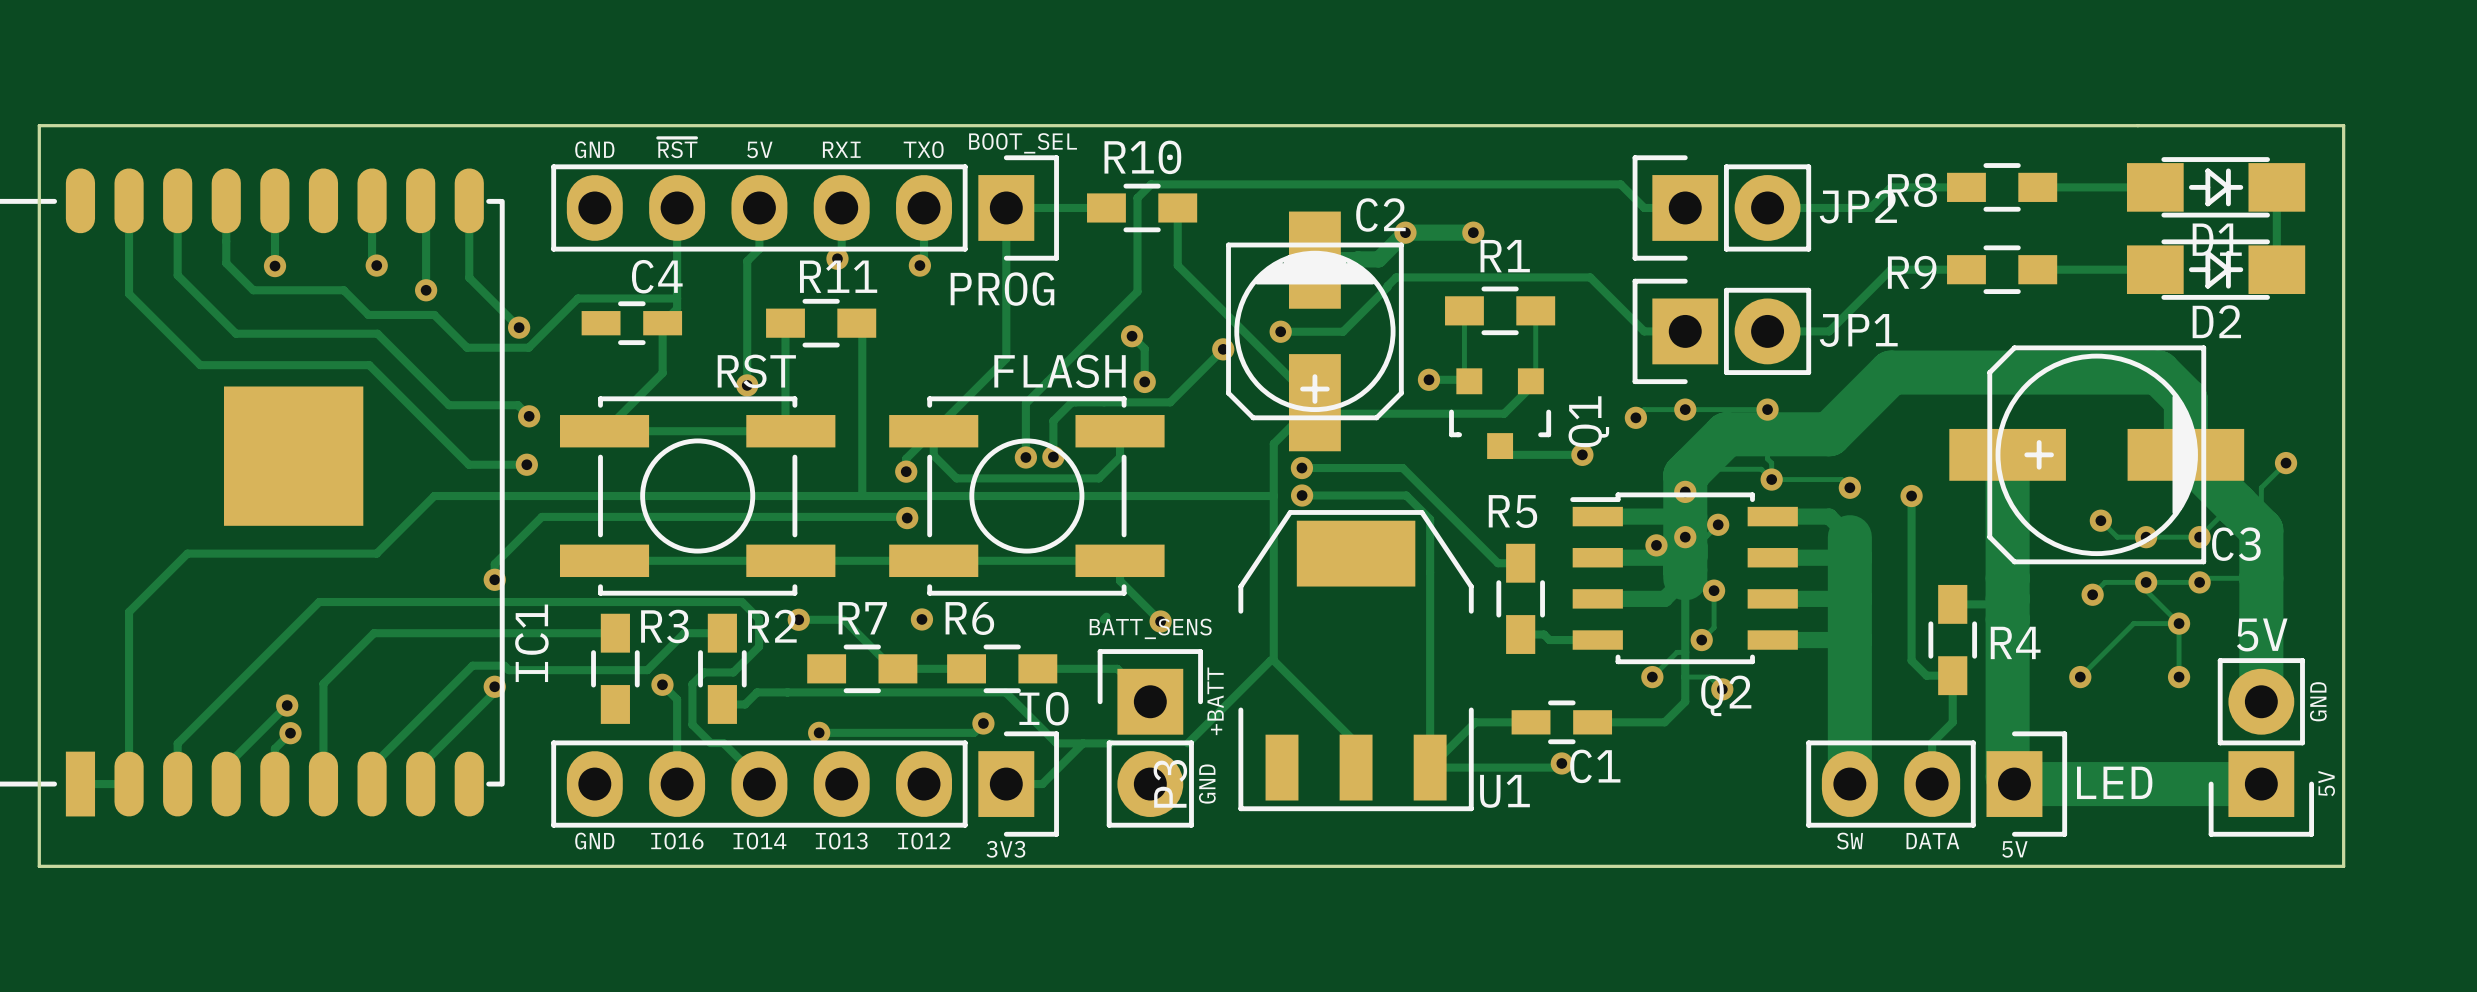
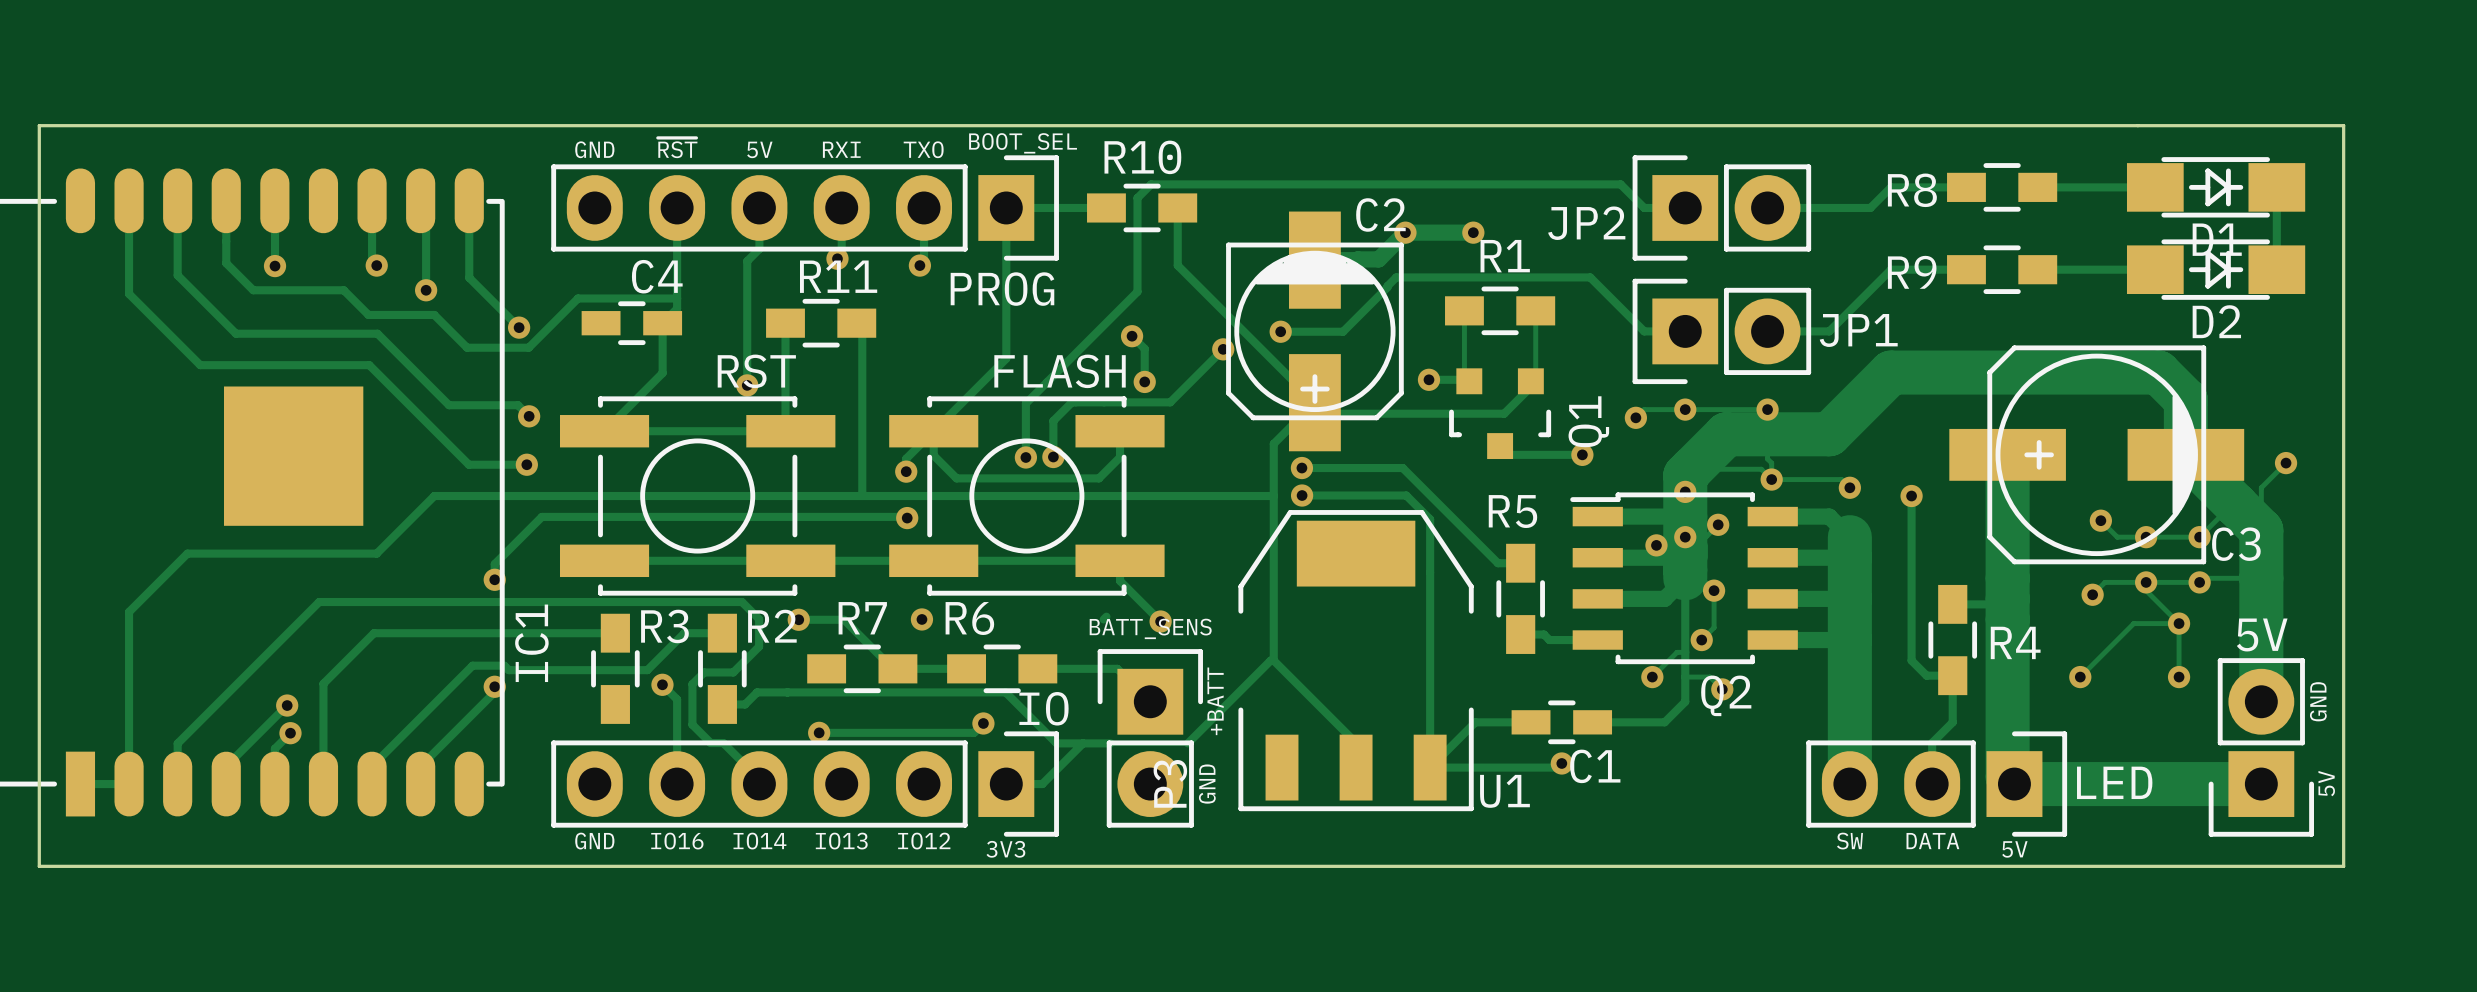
JP2 name position: JP2 (1858, 206) -> JP2 (1586, 223)

